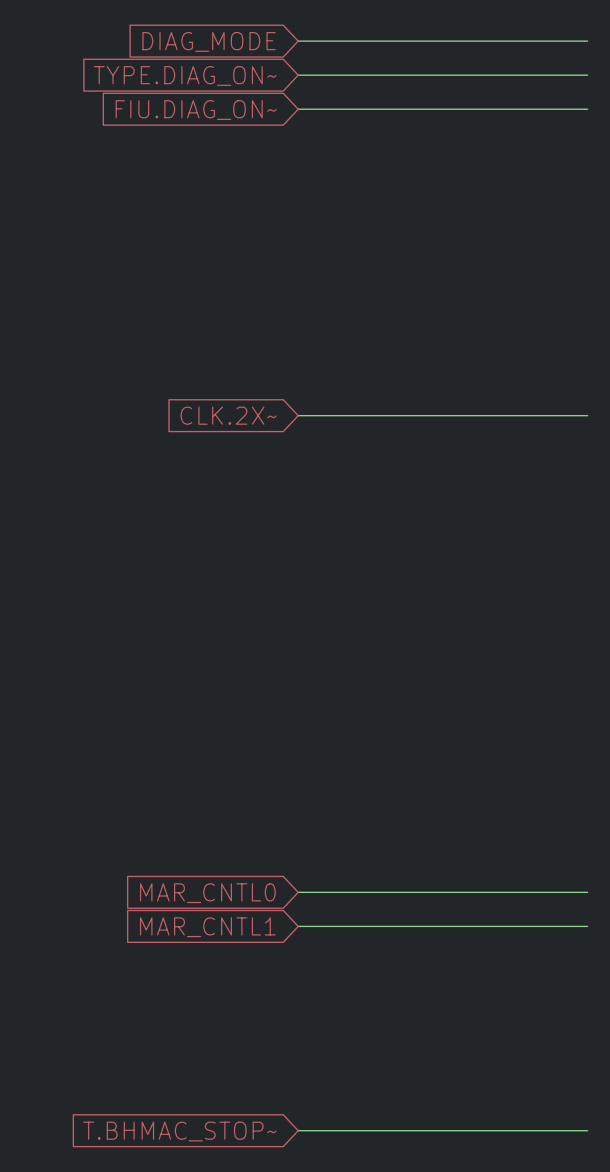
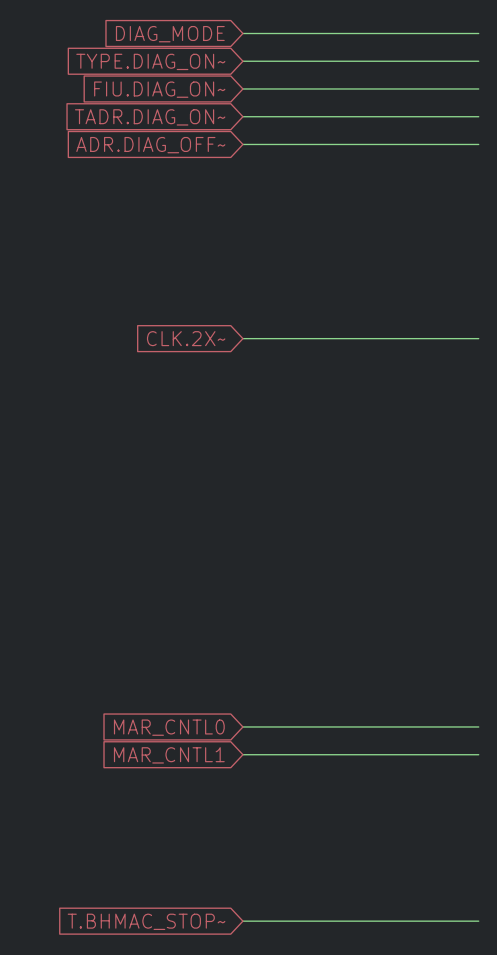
wire: none -> (242, 116) (478, 116)
global label: none -> TADR.DIAG_ON~ (150, 117)
wire: none -> (242, 144) (478, 144)
global label: none -> ADR.DIAG_OFF~ (150, 145)

